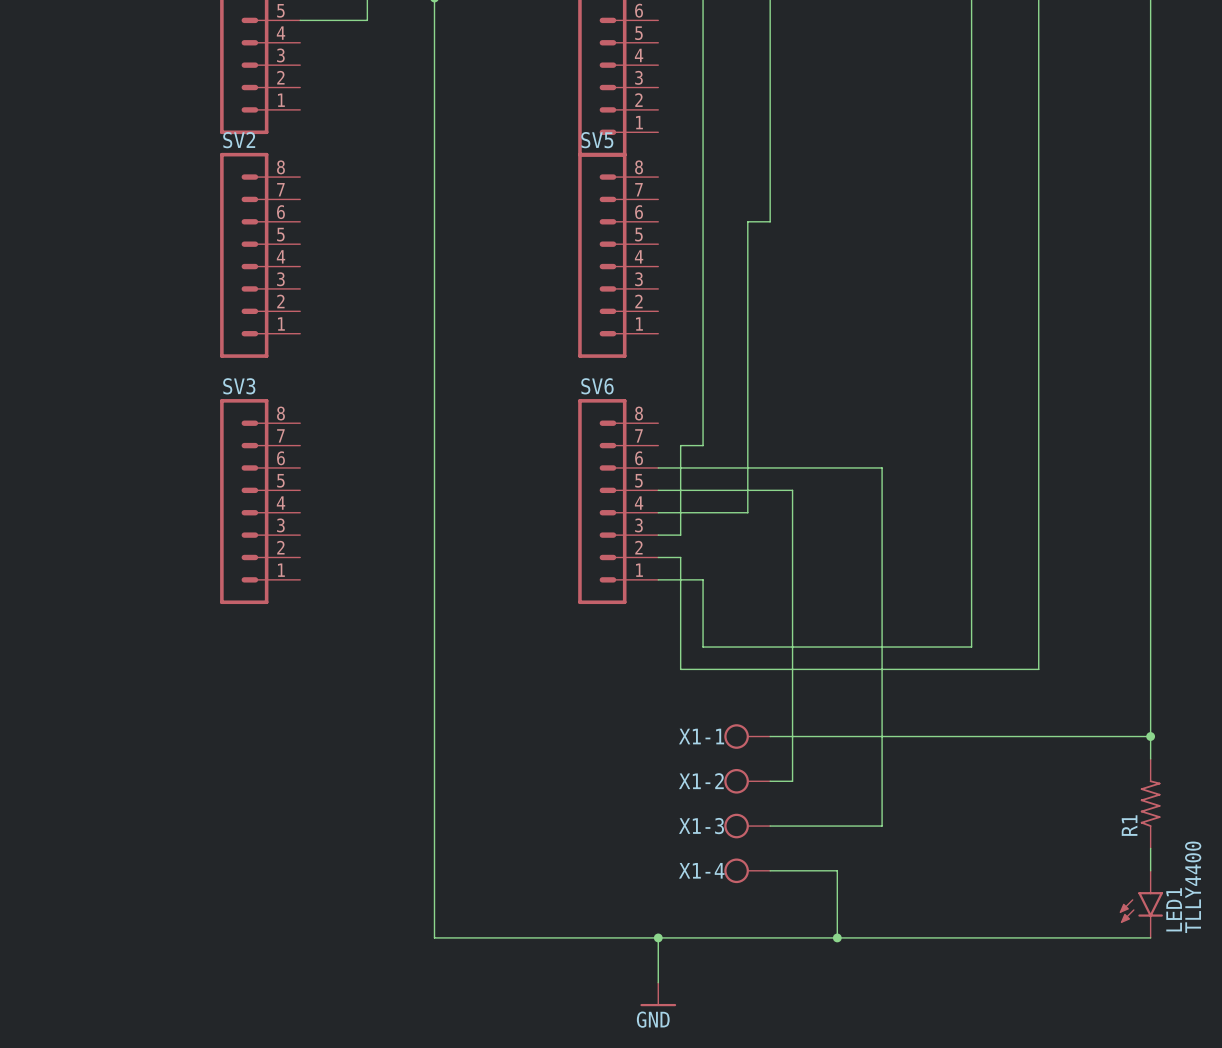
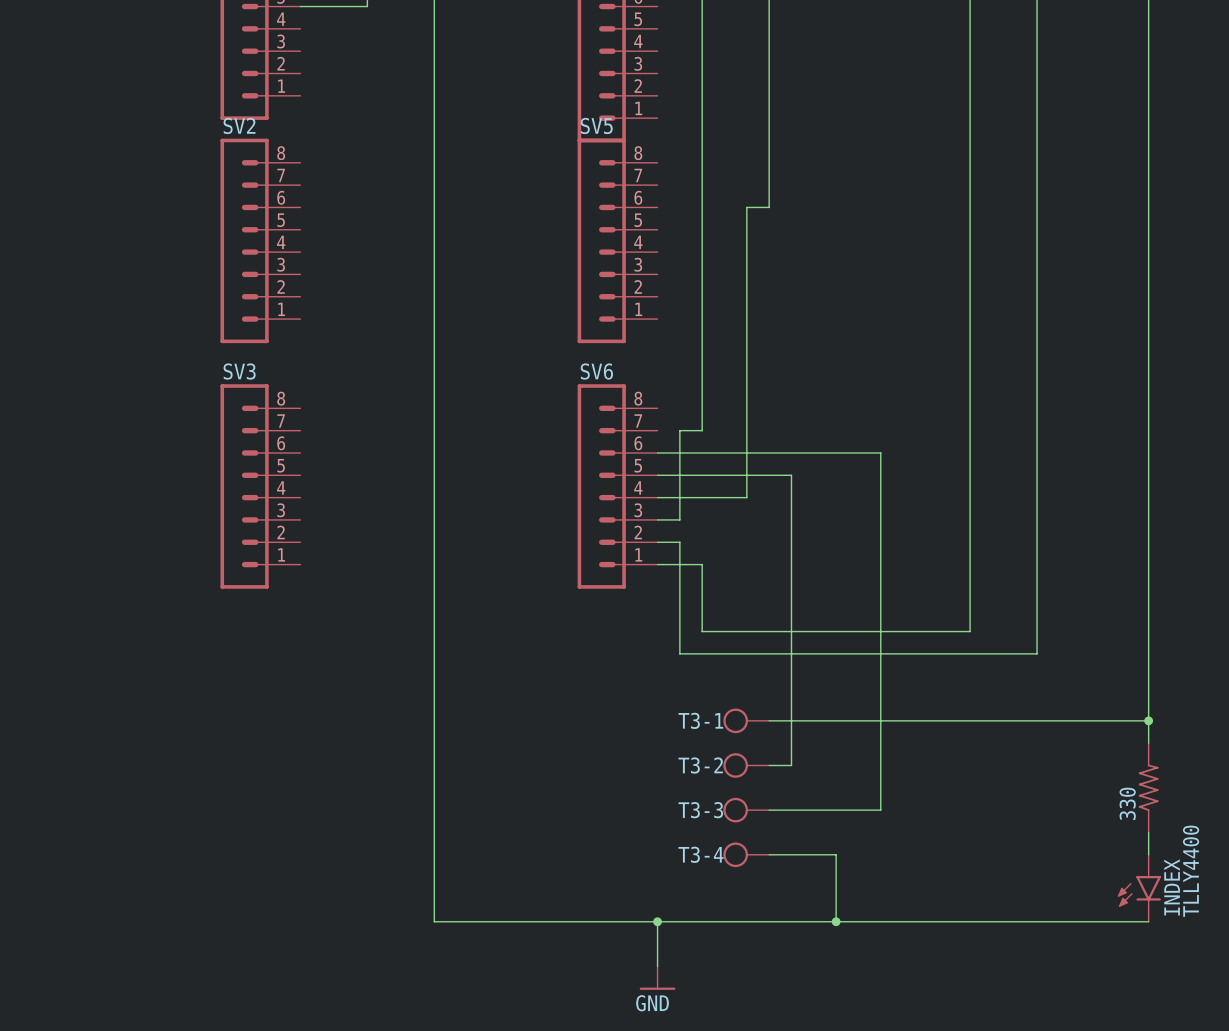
X1-1 name: X1-1 (701, 736) -> T3-1 (700, 720)
X1-2 name: X1-2 (701, 781) -> T3-2 (700, 765)
R1 name: R1 (1129, 825) -> 330 (1127, 803)
X1-3 name: X1-3 (701, 826) -> T3-3 (700, 810)
X1-4 name: X1-4 (701, 870) -> T3-4 (701, 854)
LED1 name: LED1 (1174, 909) -> INDEX (1172, 887)

